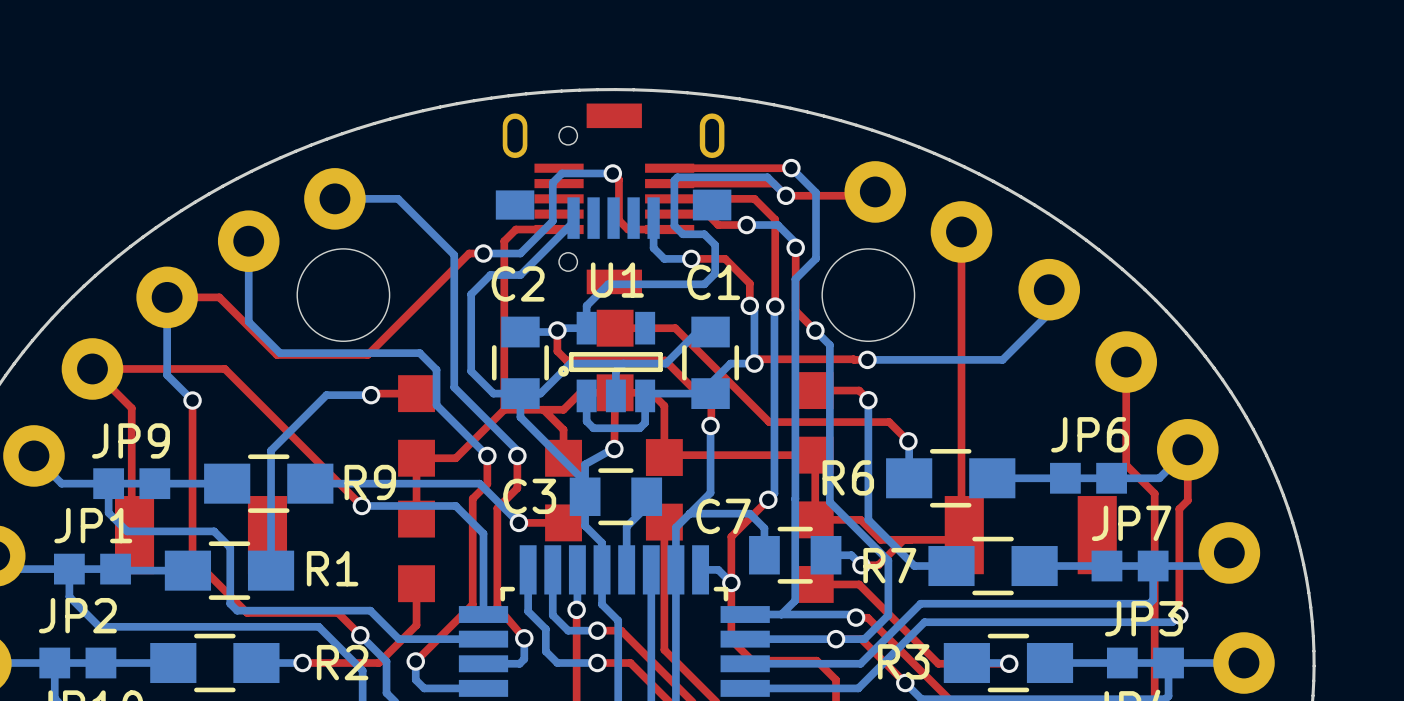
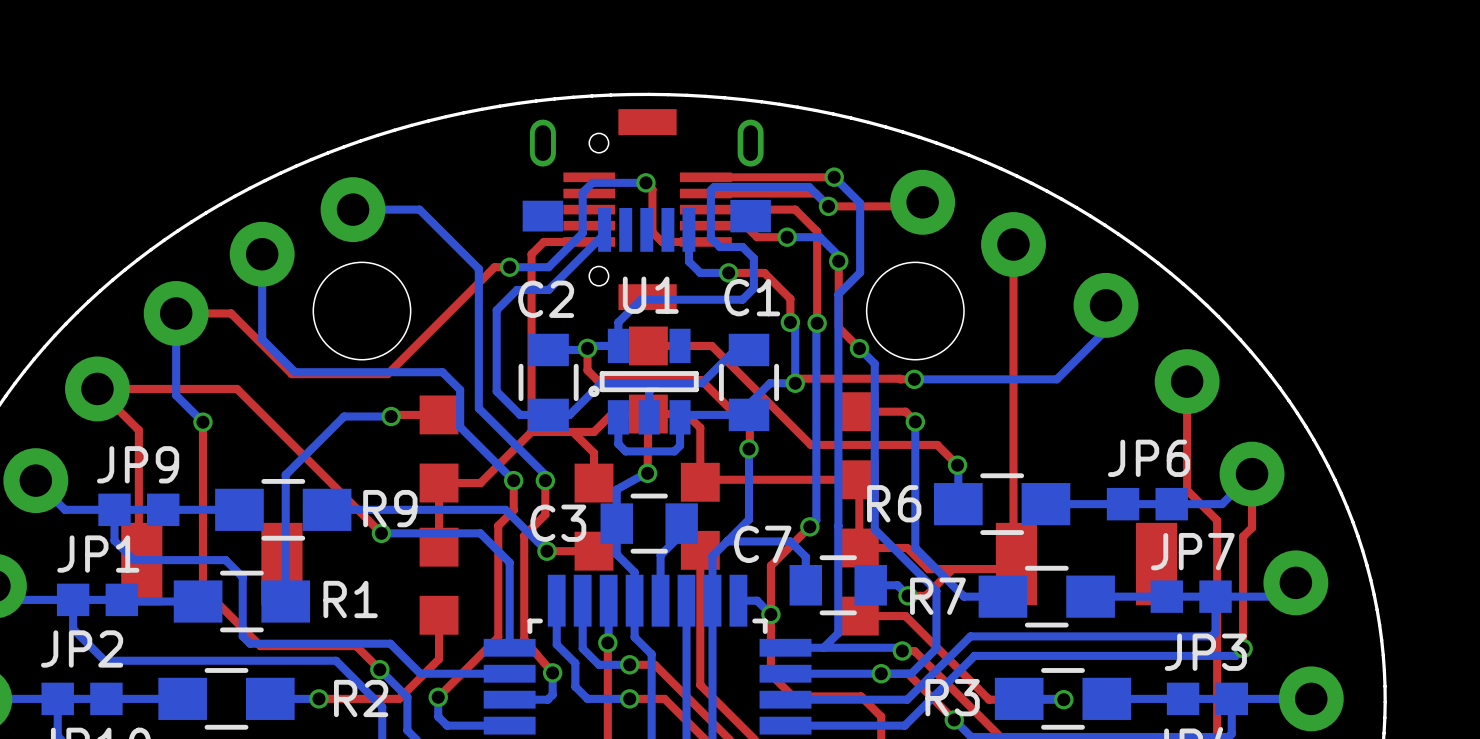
bottom track: (520, 393) (520, 417) (585, 481) -> none

